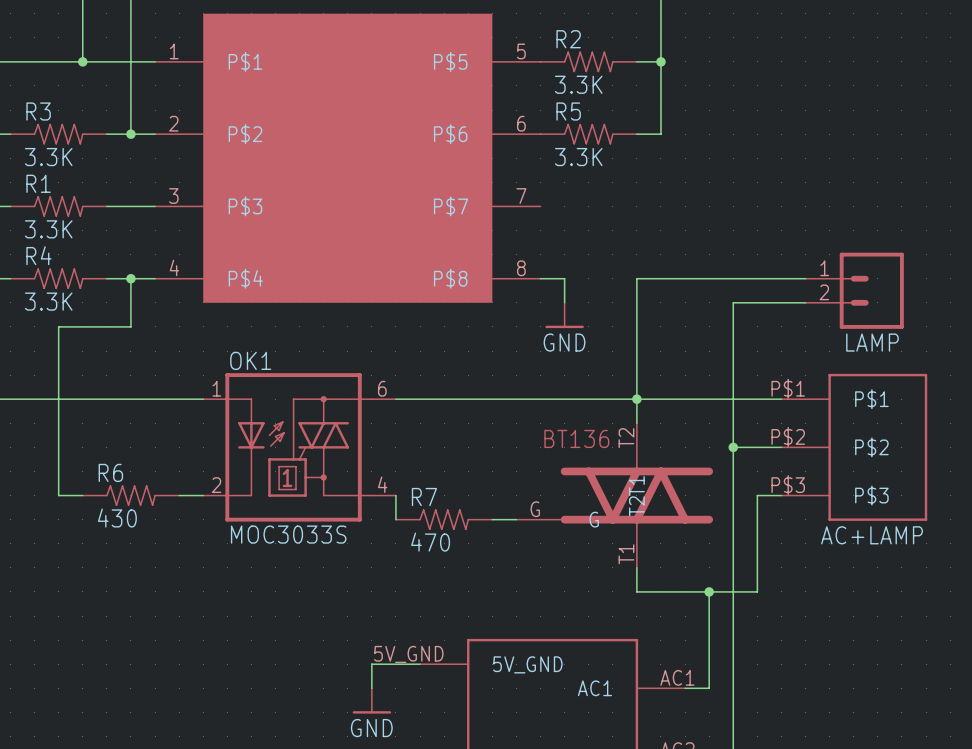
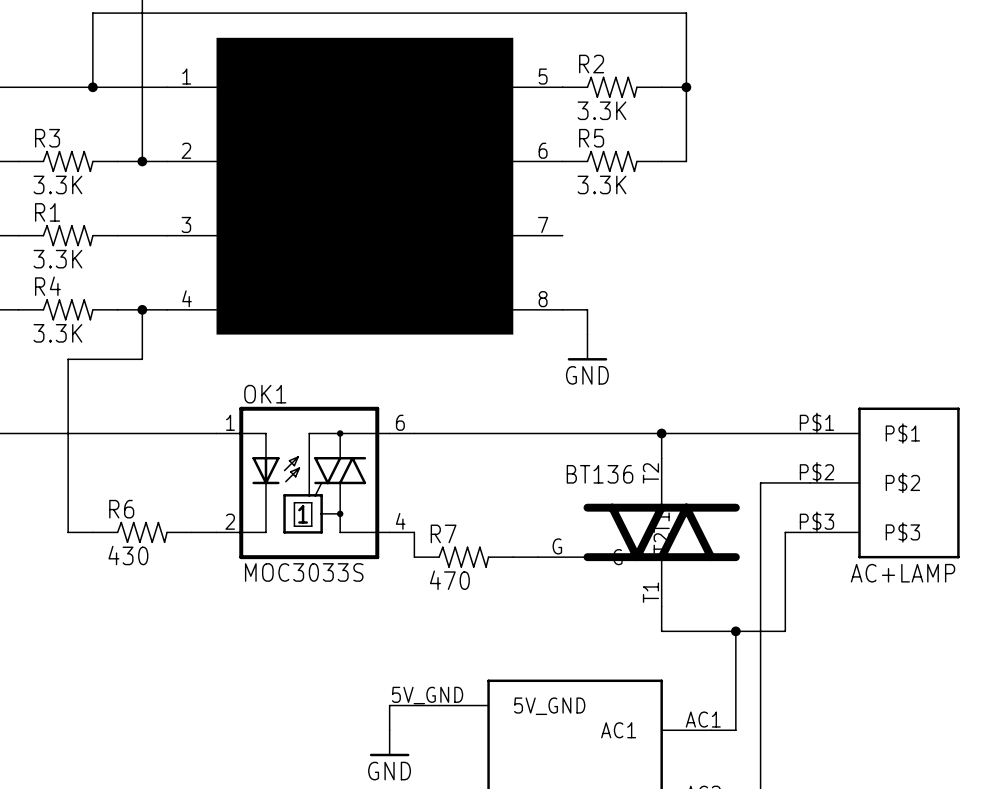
wire: (805, 278) (636, 278) (636, 399) -> none
LAMP: (854, 290) -> none
wire: (805, 302) (733, 302) (733, 447) -> none
junction: (733, 447) -> none

